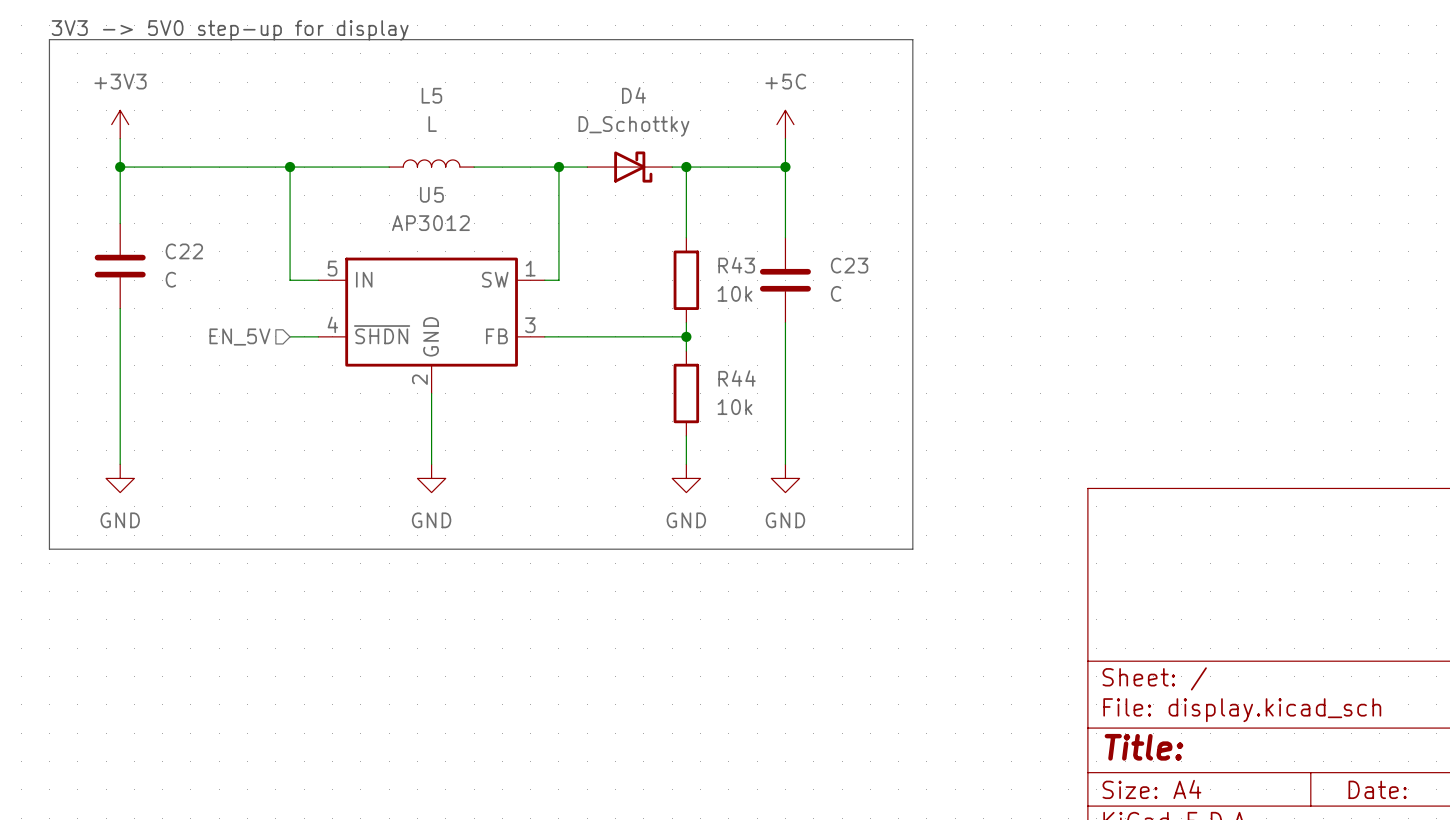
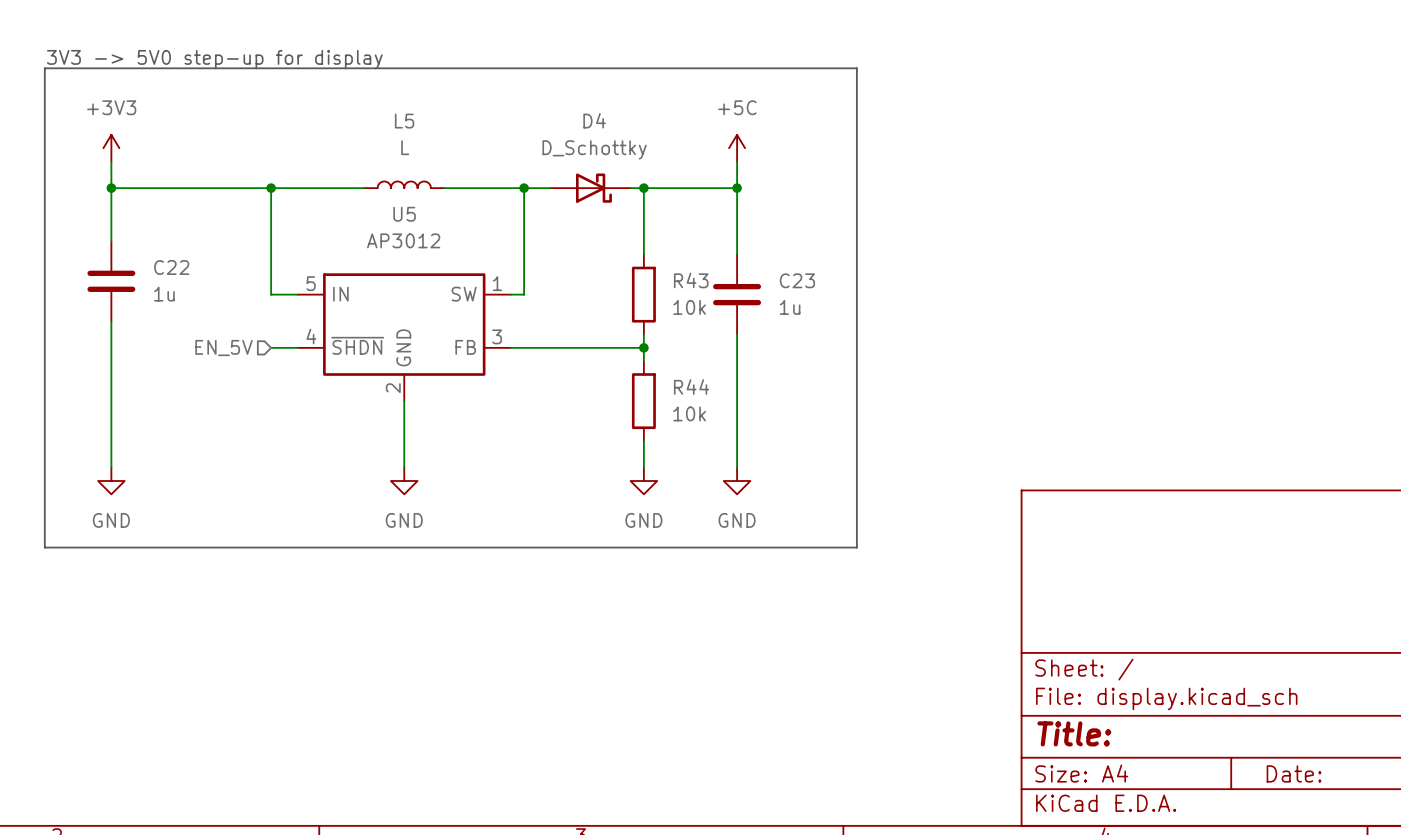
C22 value: C (170, 279) -> 1u (164, 294)
C23 value: C (836, 293) -> 1u (790, 307)

